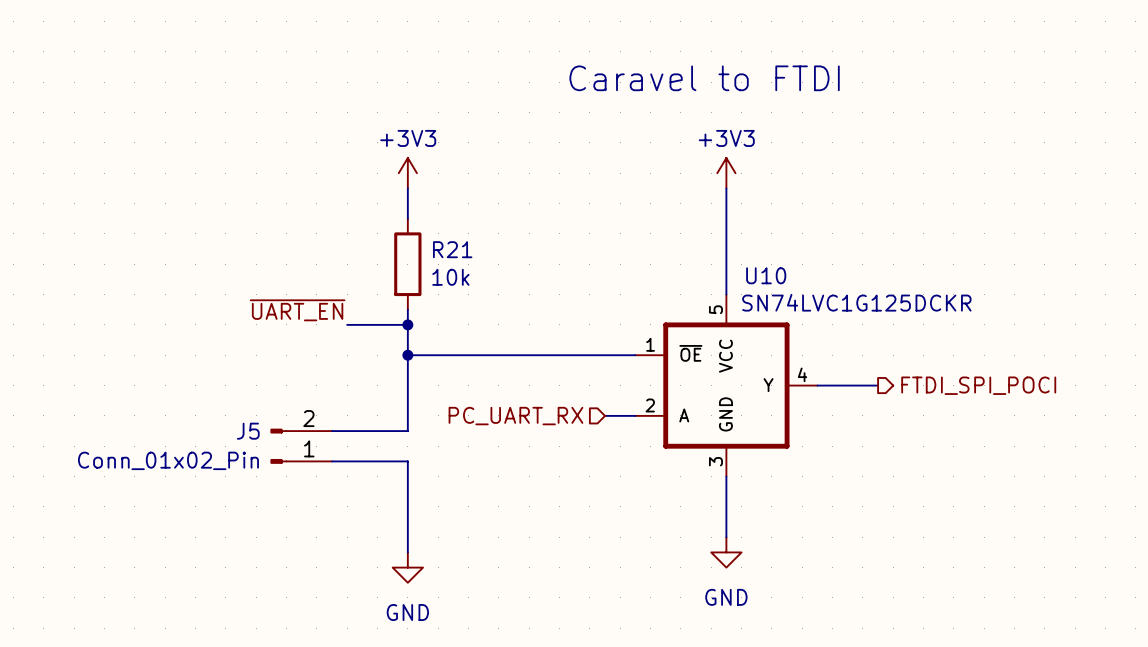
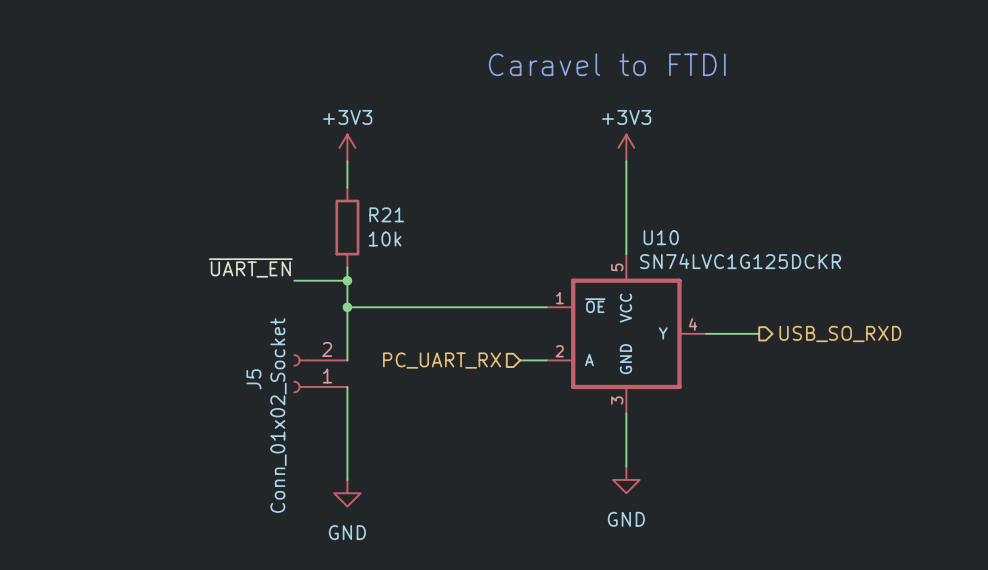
hierarchical label: FTDI_SPI_POCI (978, 385) -> USB_SO_RXD (840, 333)
wire: (407, 415) (407, 431) (332, 431) -> none
J5 symbol: [270, 428, 333, 464] -> [293, 354, 348, 394]
J5 name position: J5 (248, 431) -> J5 (253, 379)
J5 value: Conn_01x02_Pin (168, 460) -> Conn_01x02_Socket (278, 415)
wire: (332, 461) (407, 461) -> (347, 386) (347, 400)

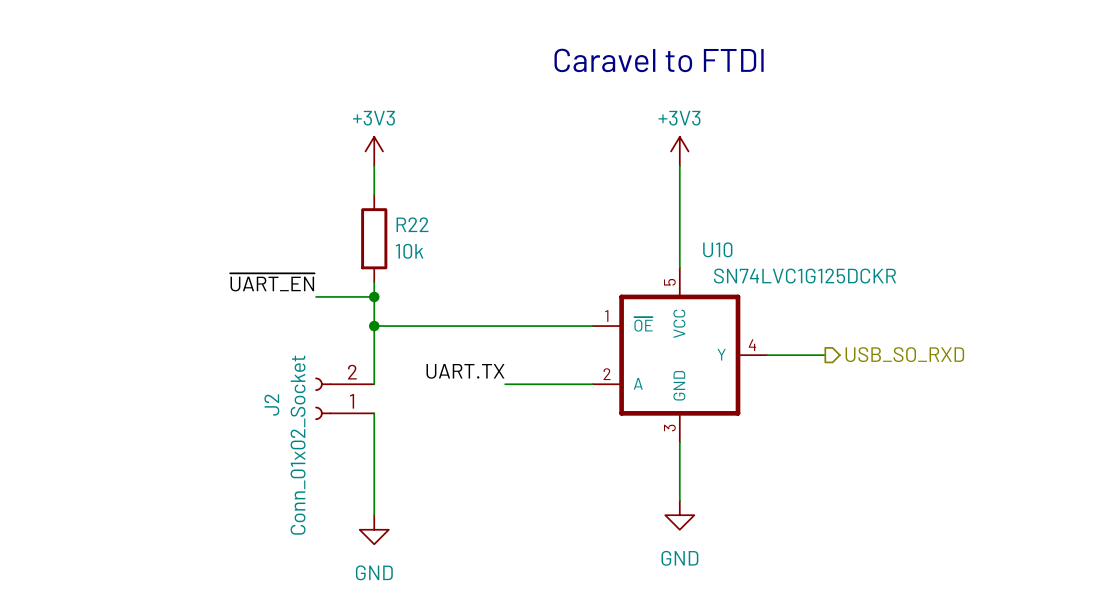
R21 name: R21 (386, 214) -> R22 (412, 224)
label: none -> UART.TX (465, 371)
hierarchical label: PC_UART_RX (442, 360) -> none
wire: none -> (505, 384) (563, 384)
J5 name: J5 (253, 379) -> J2 (271, 404)

